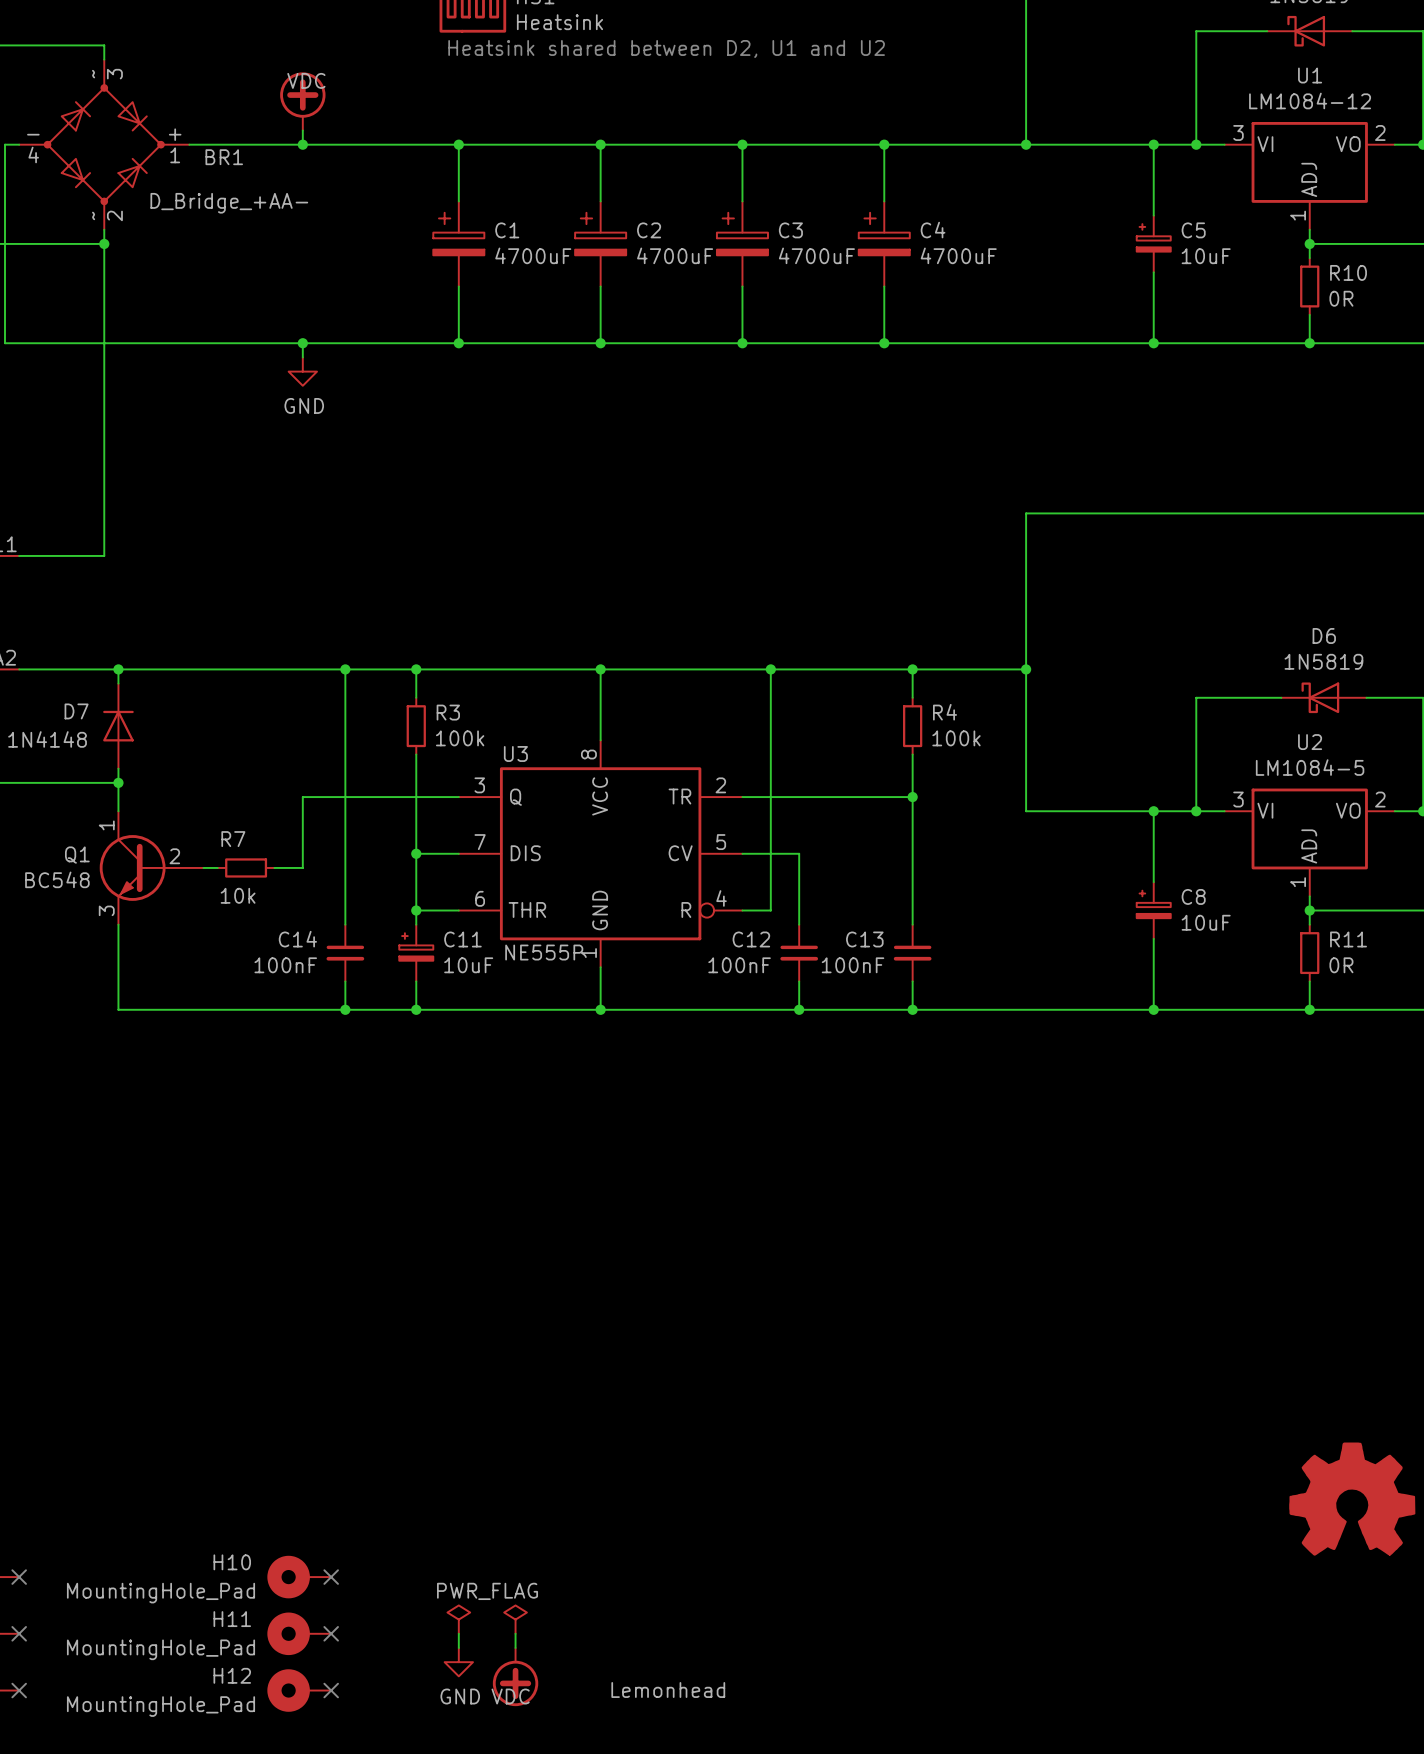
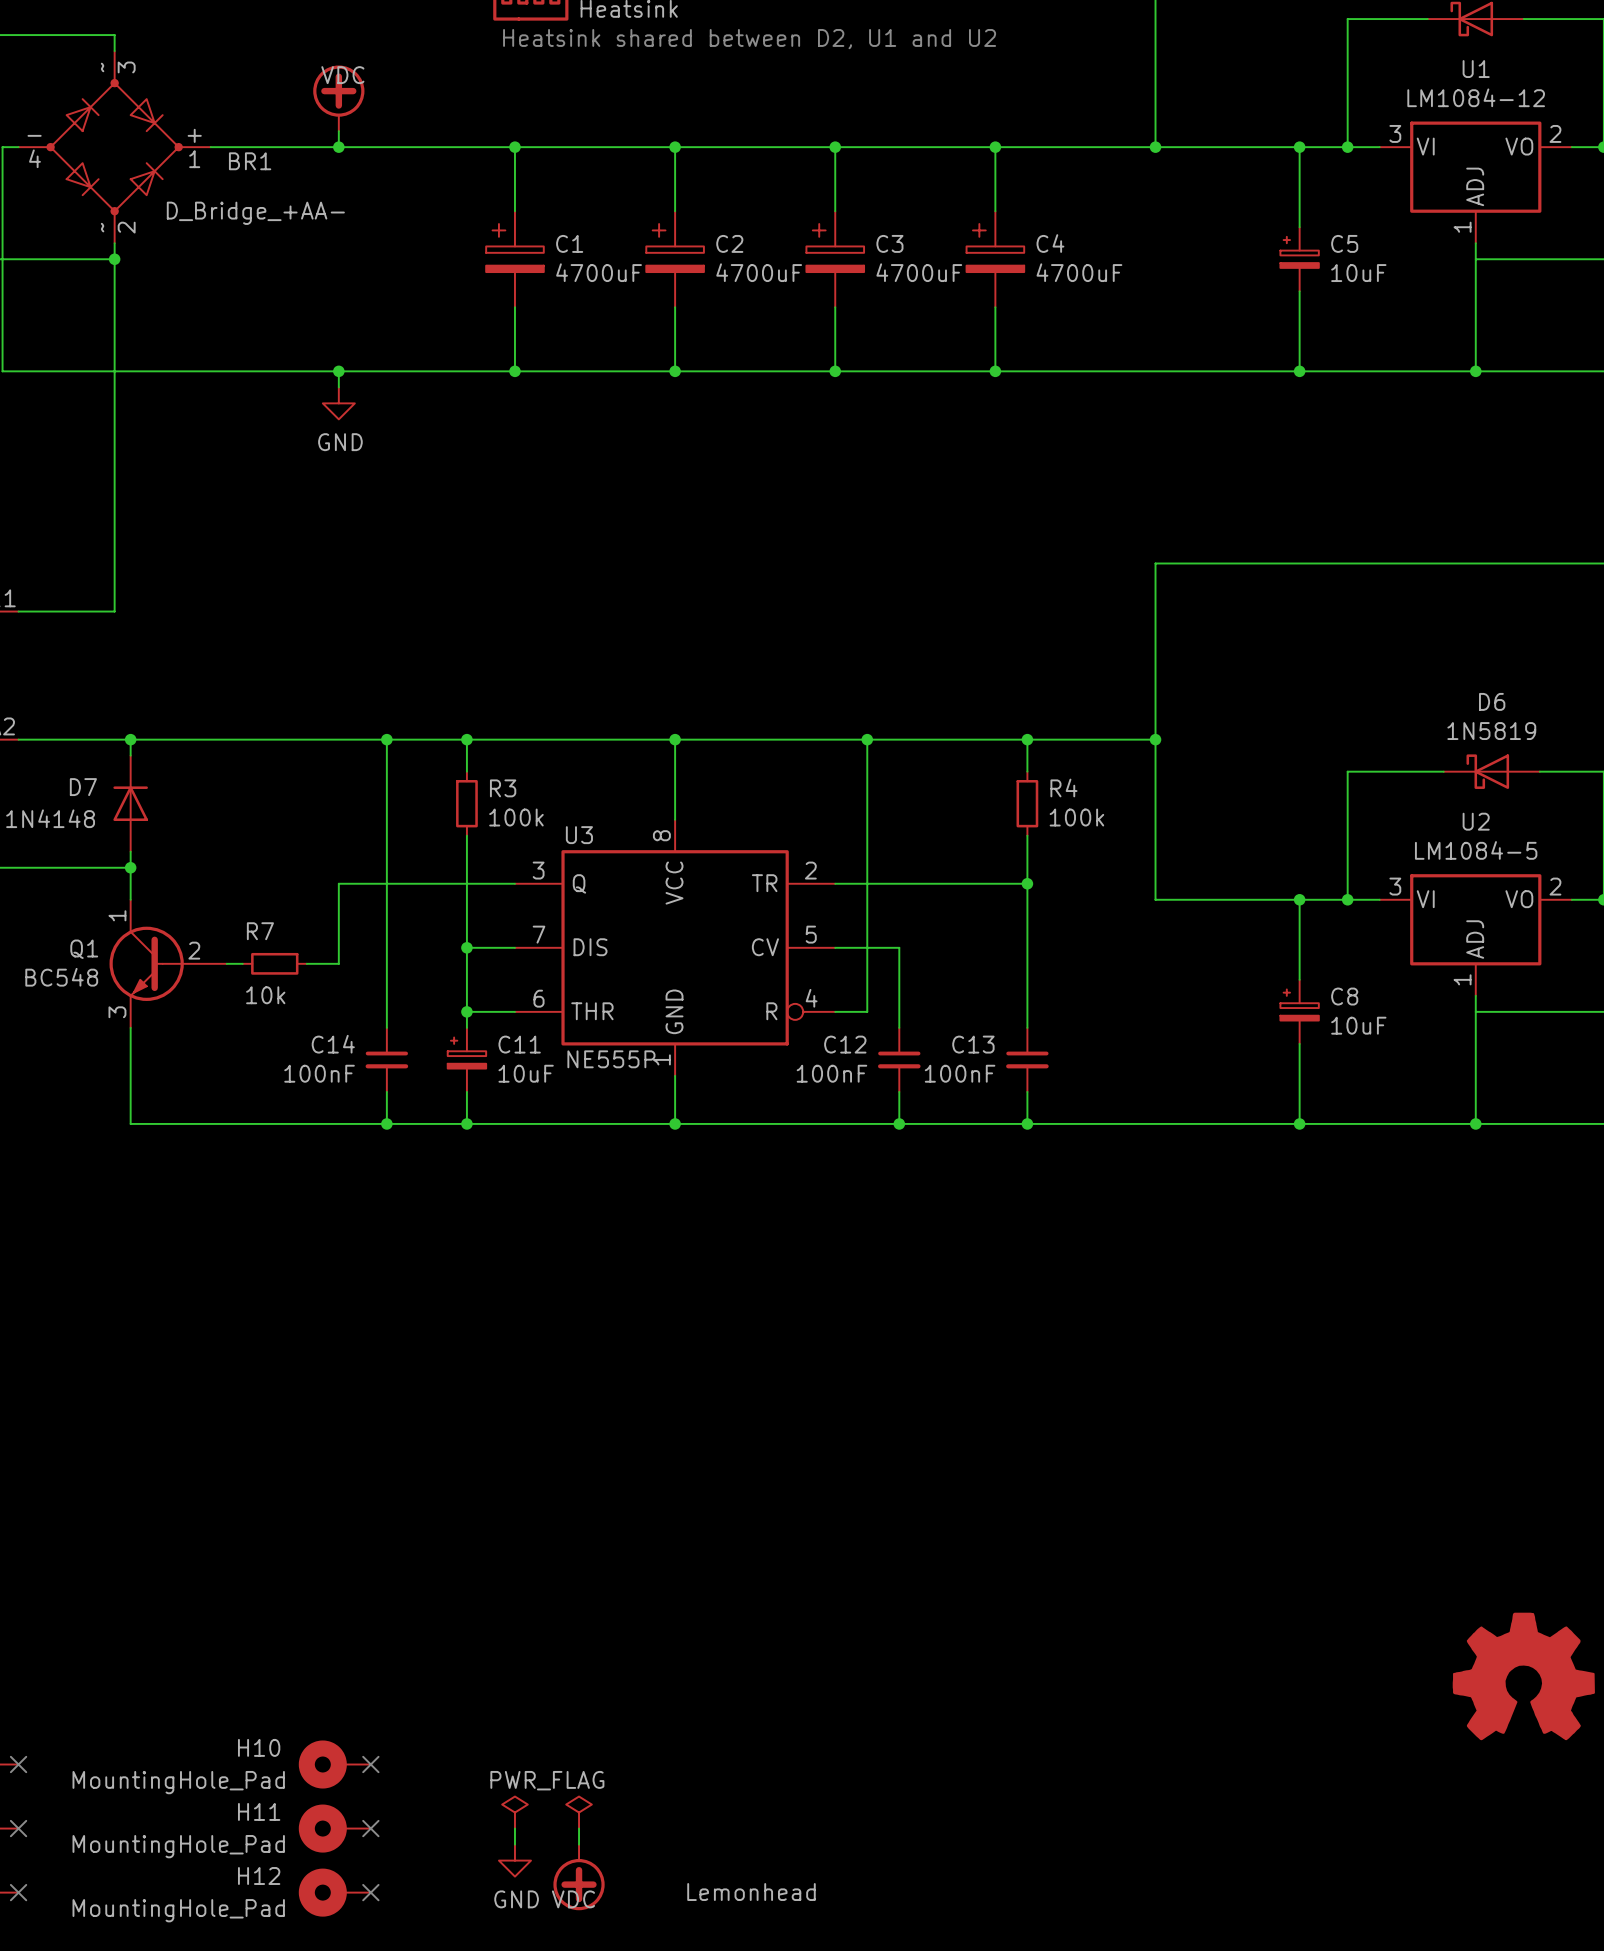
junction: (1309, 243) -> none
wire: none -> (1475, 275) (1475, 339)
R10: 0R (1309, 286) -> none
junction: (1309, 910) -> none
wire: none -> (1475, 1027) (1475, 1091)
R11: 0R (1309, 953) -> none

